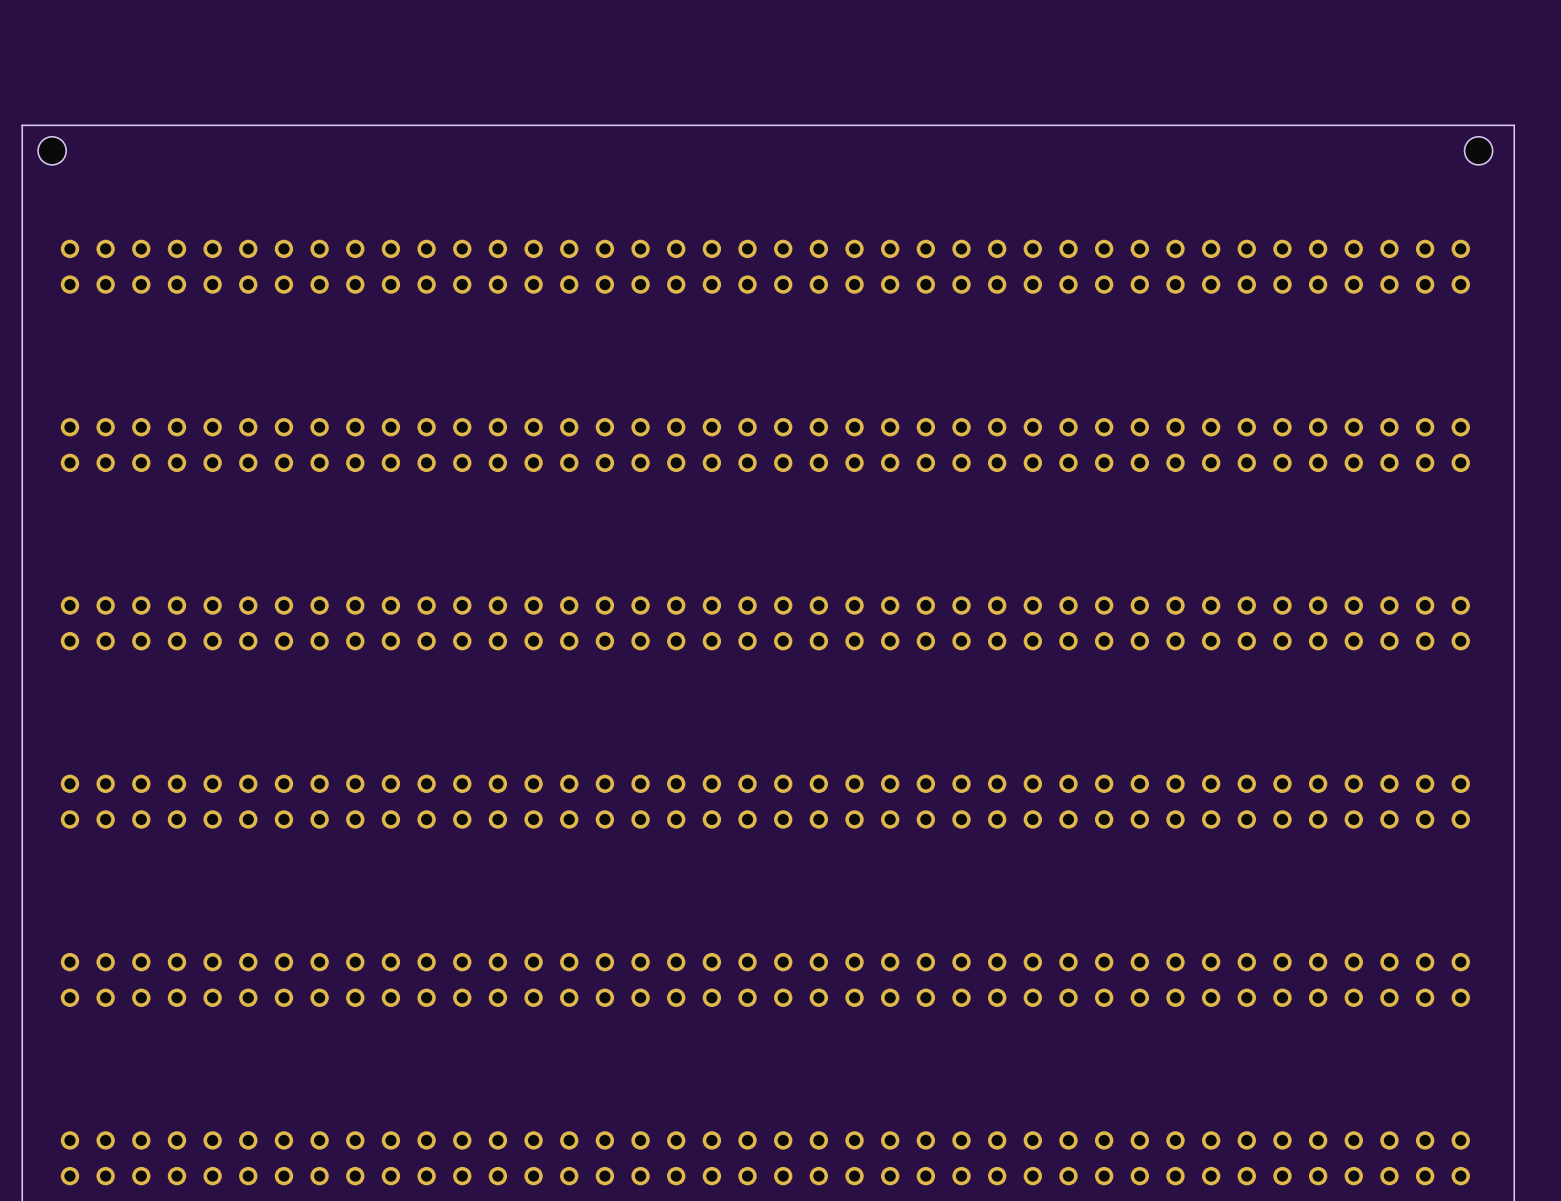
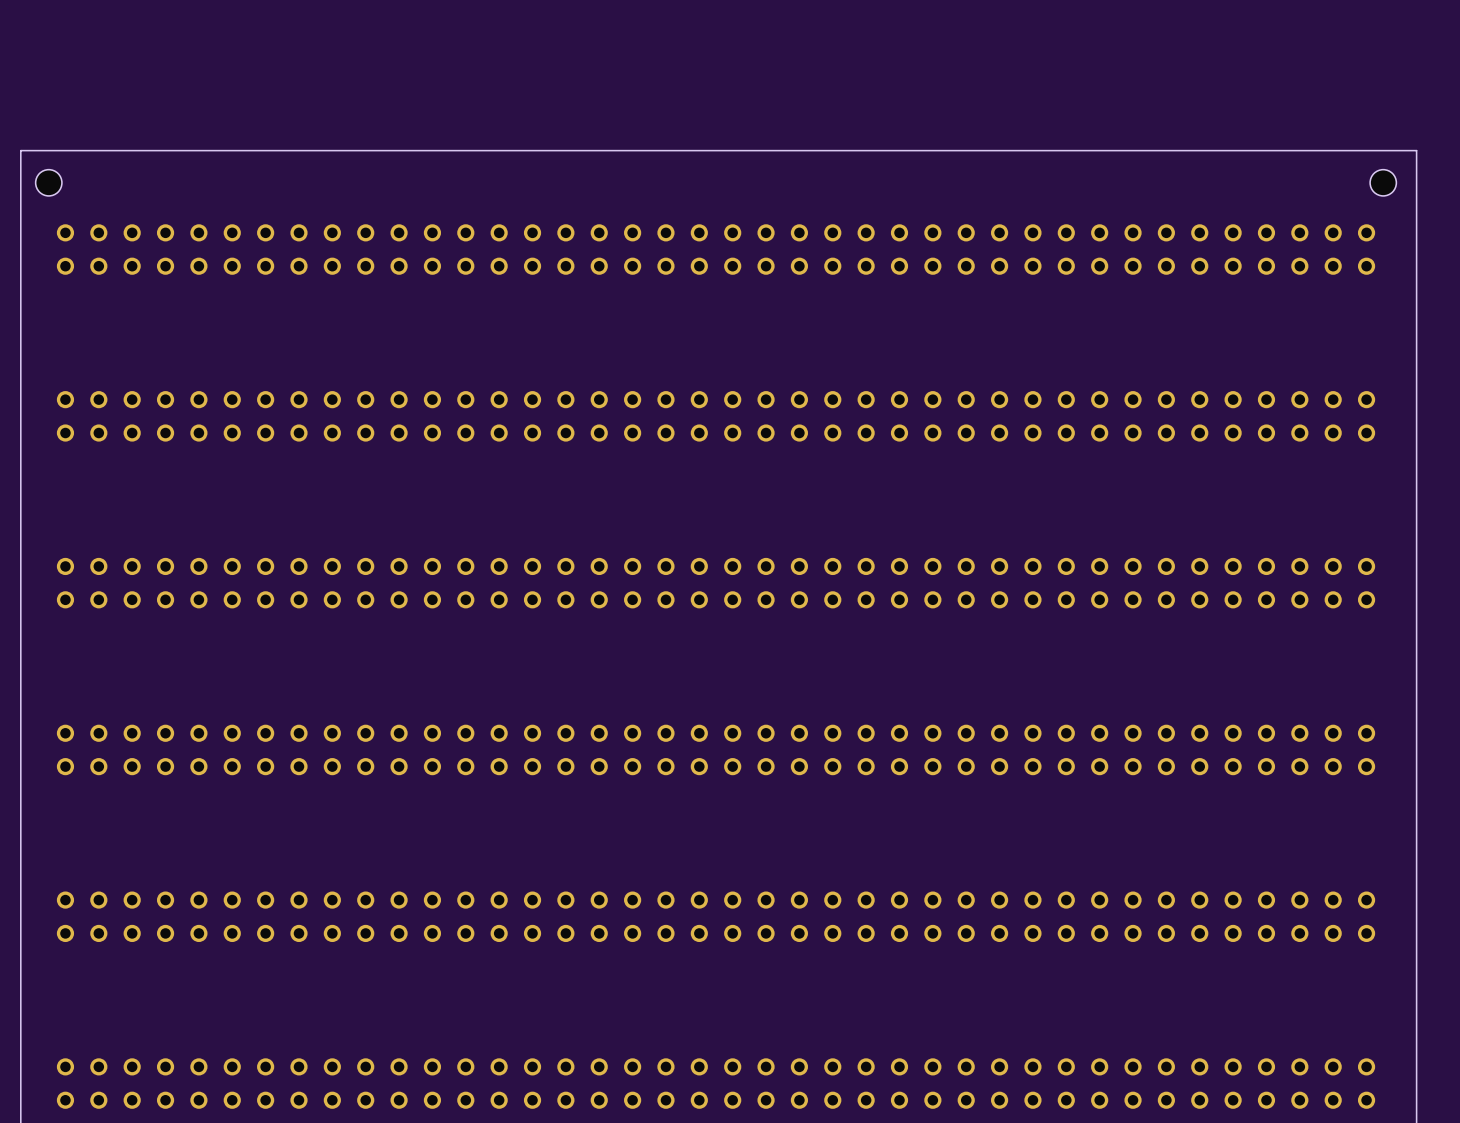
hole position: (52, 150) -> (48, 182)
hole position: (1478, 150) -> (1383, 182)
board edge: (1514, 161) (1514, 125) (22, 125) (22, 161) -> (1416, 150) (20, 150)

